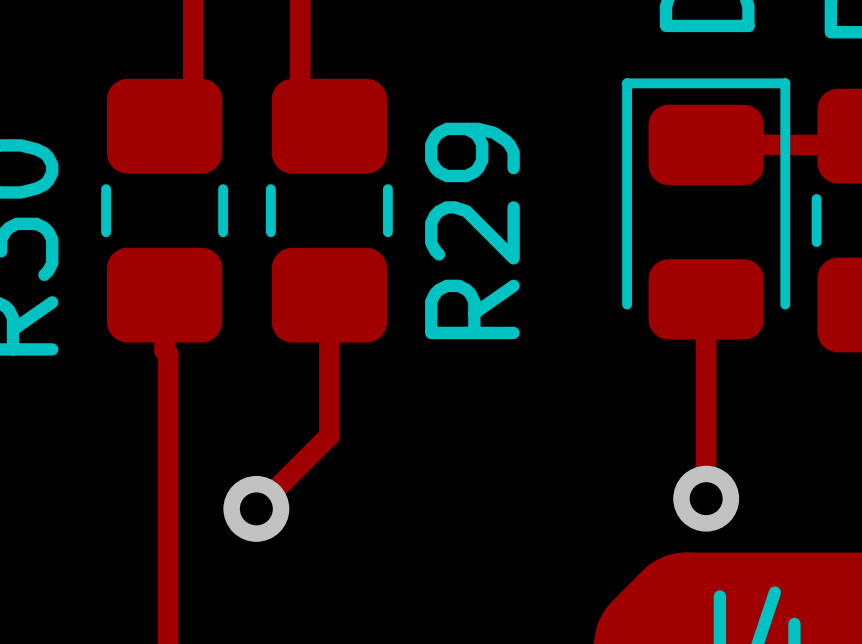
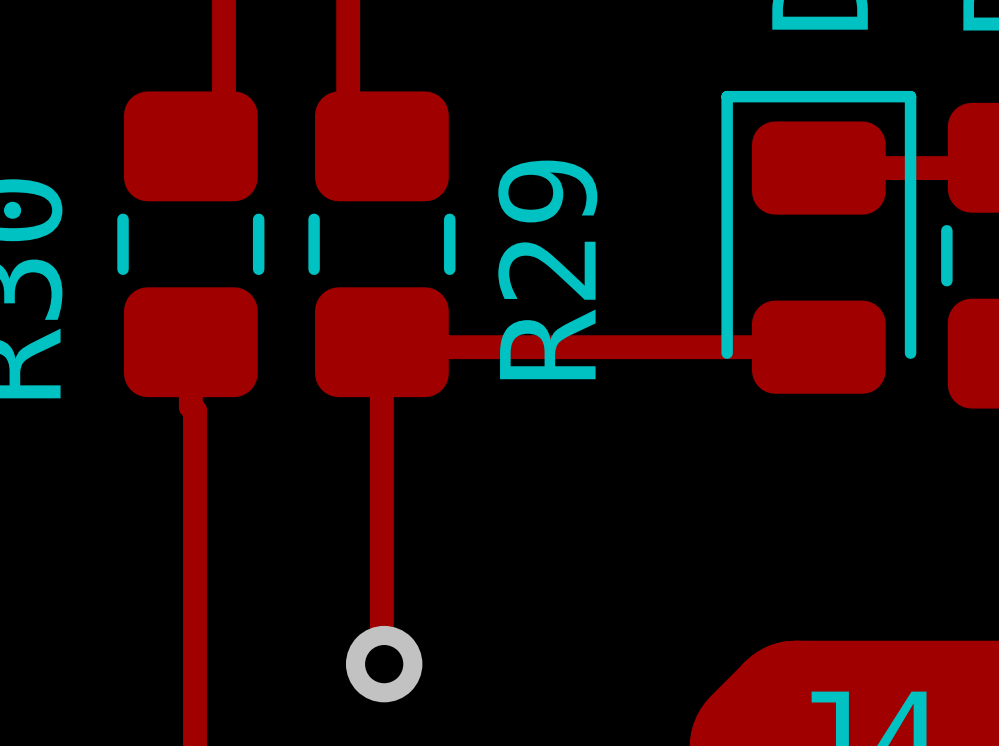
track: (706, 299) (706, 498) -> (818, 347) (386, 347) (381, 342)
track: (329, 435) (256, 508) -> (381, 505) (381, 661) (384, 664)
via: (706, 498) -> none
via position: (256, 508) -> (384, 664)

